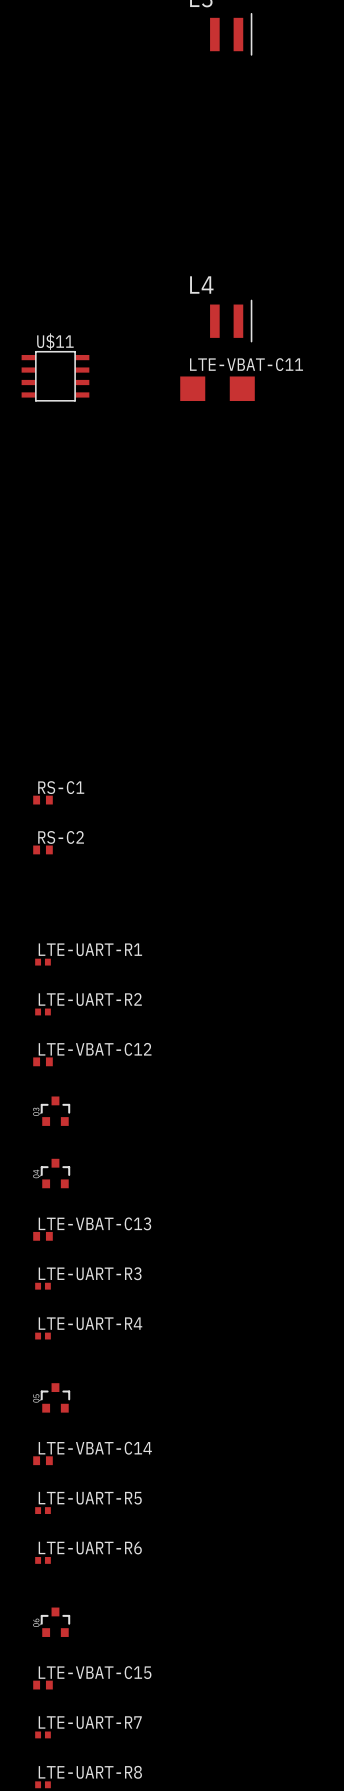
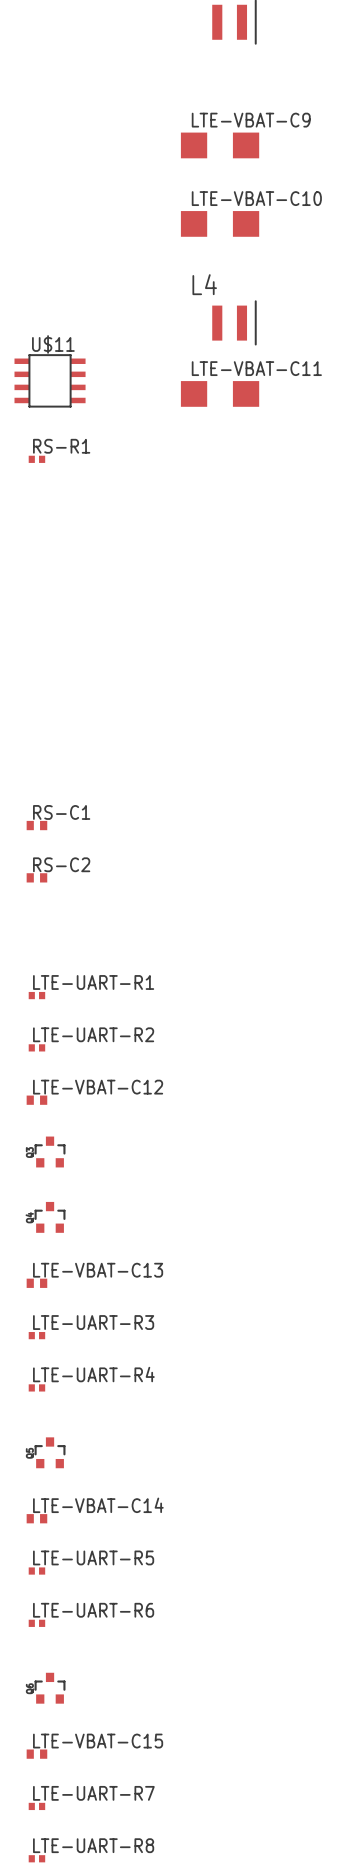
LTE-VBAT-C9: none -> (220, 145)
LTE-VBAT-C10: none -> (220, 223)
RS-R1: none -> (36, 459)

